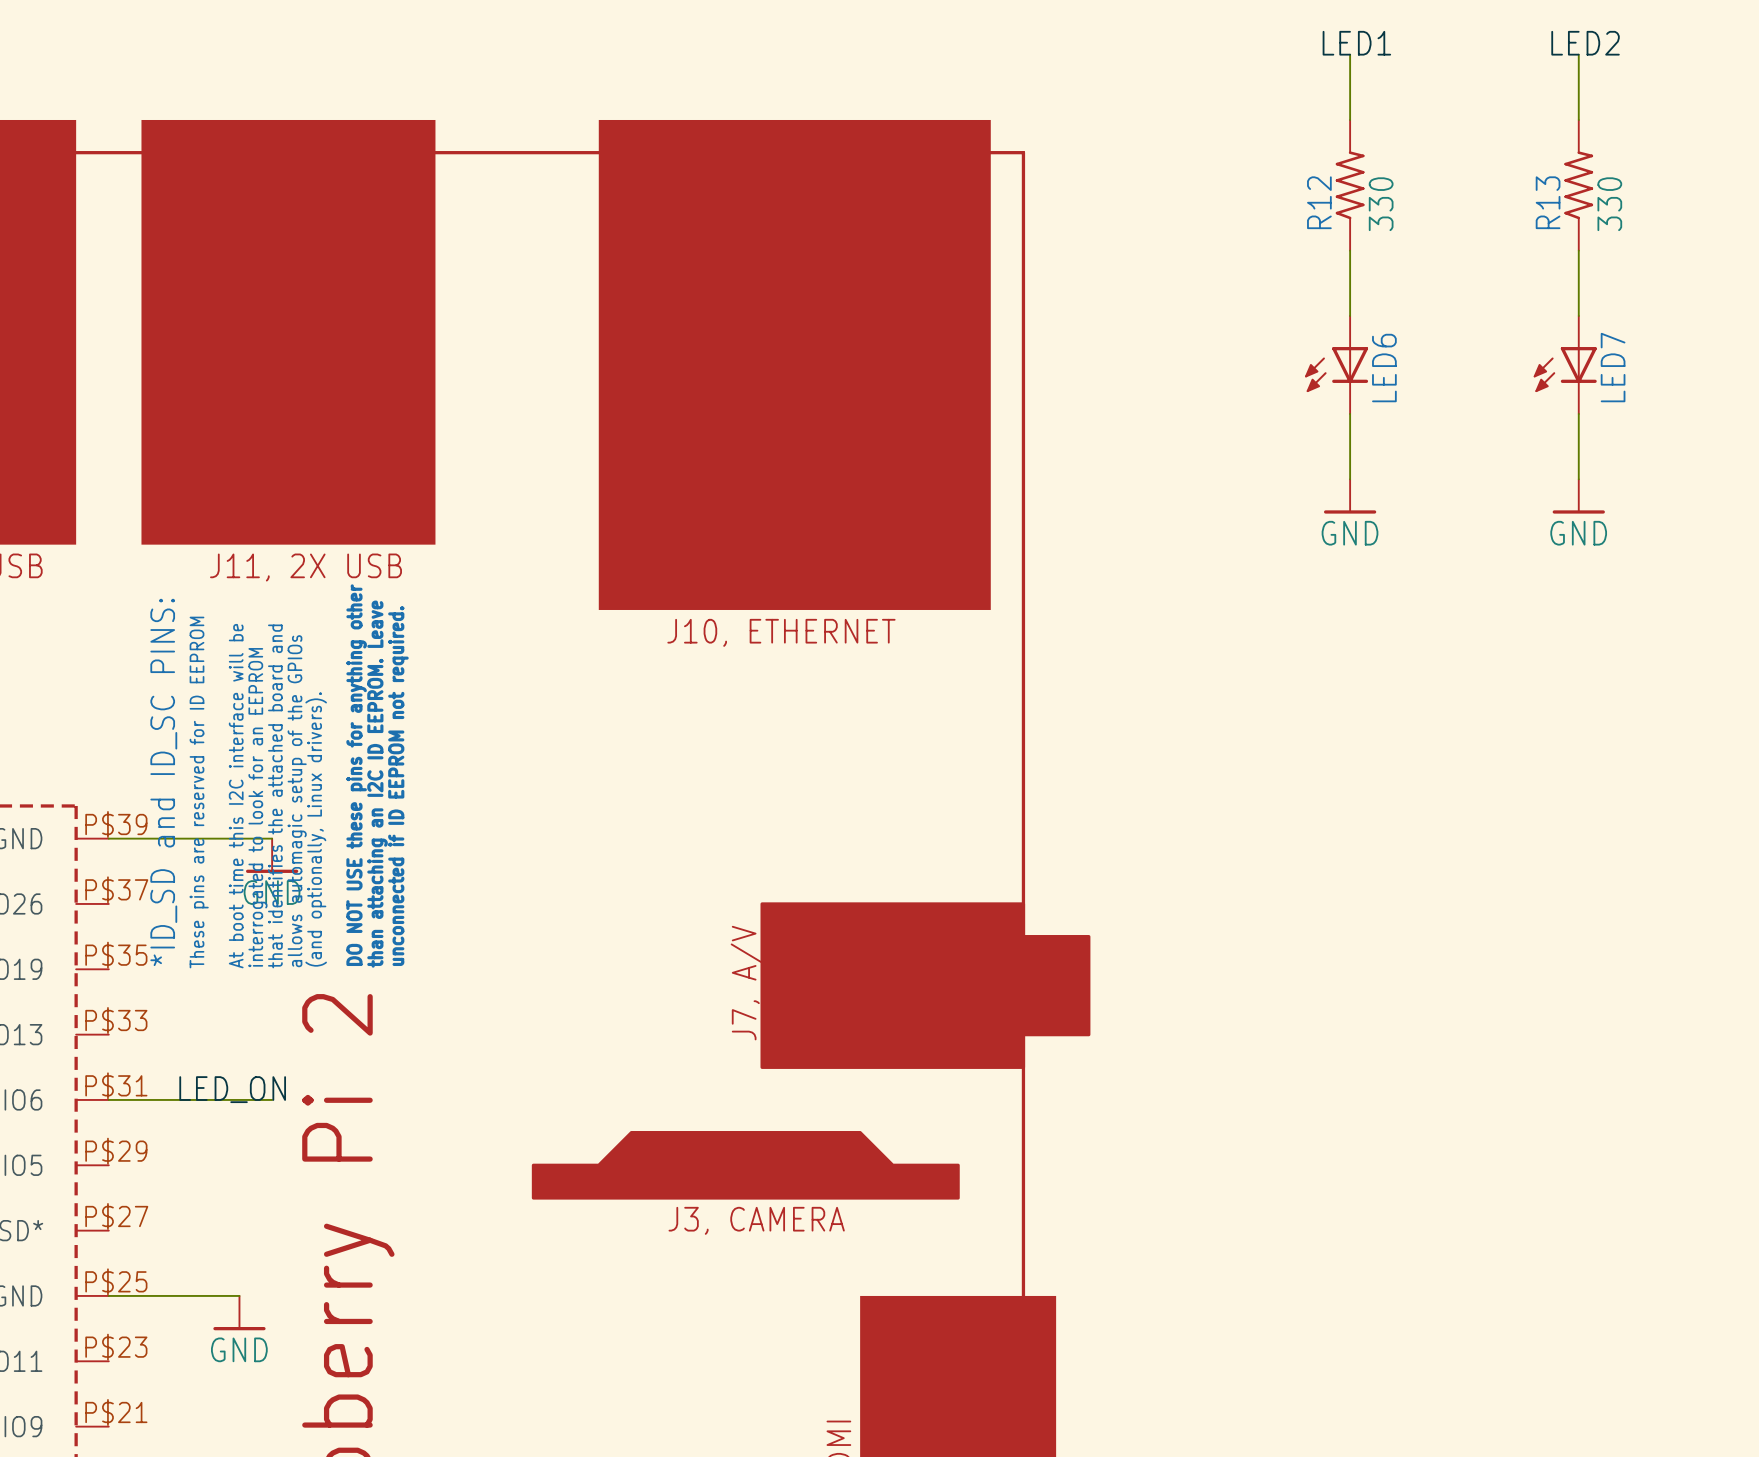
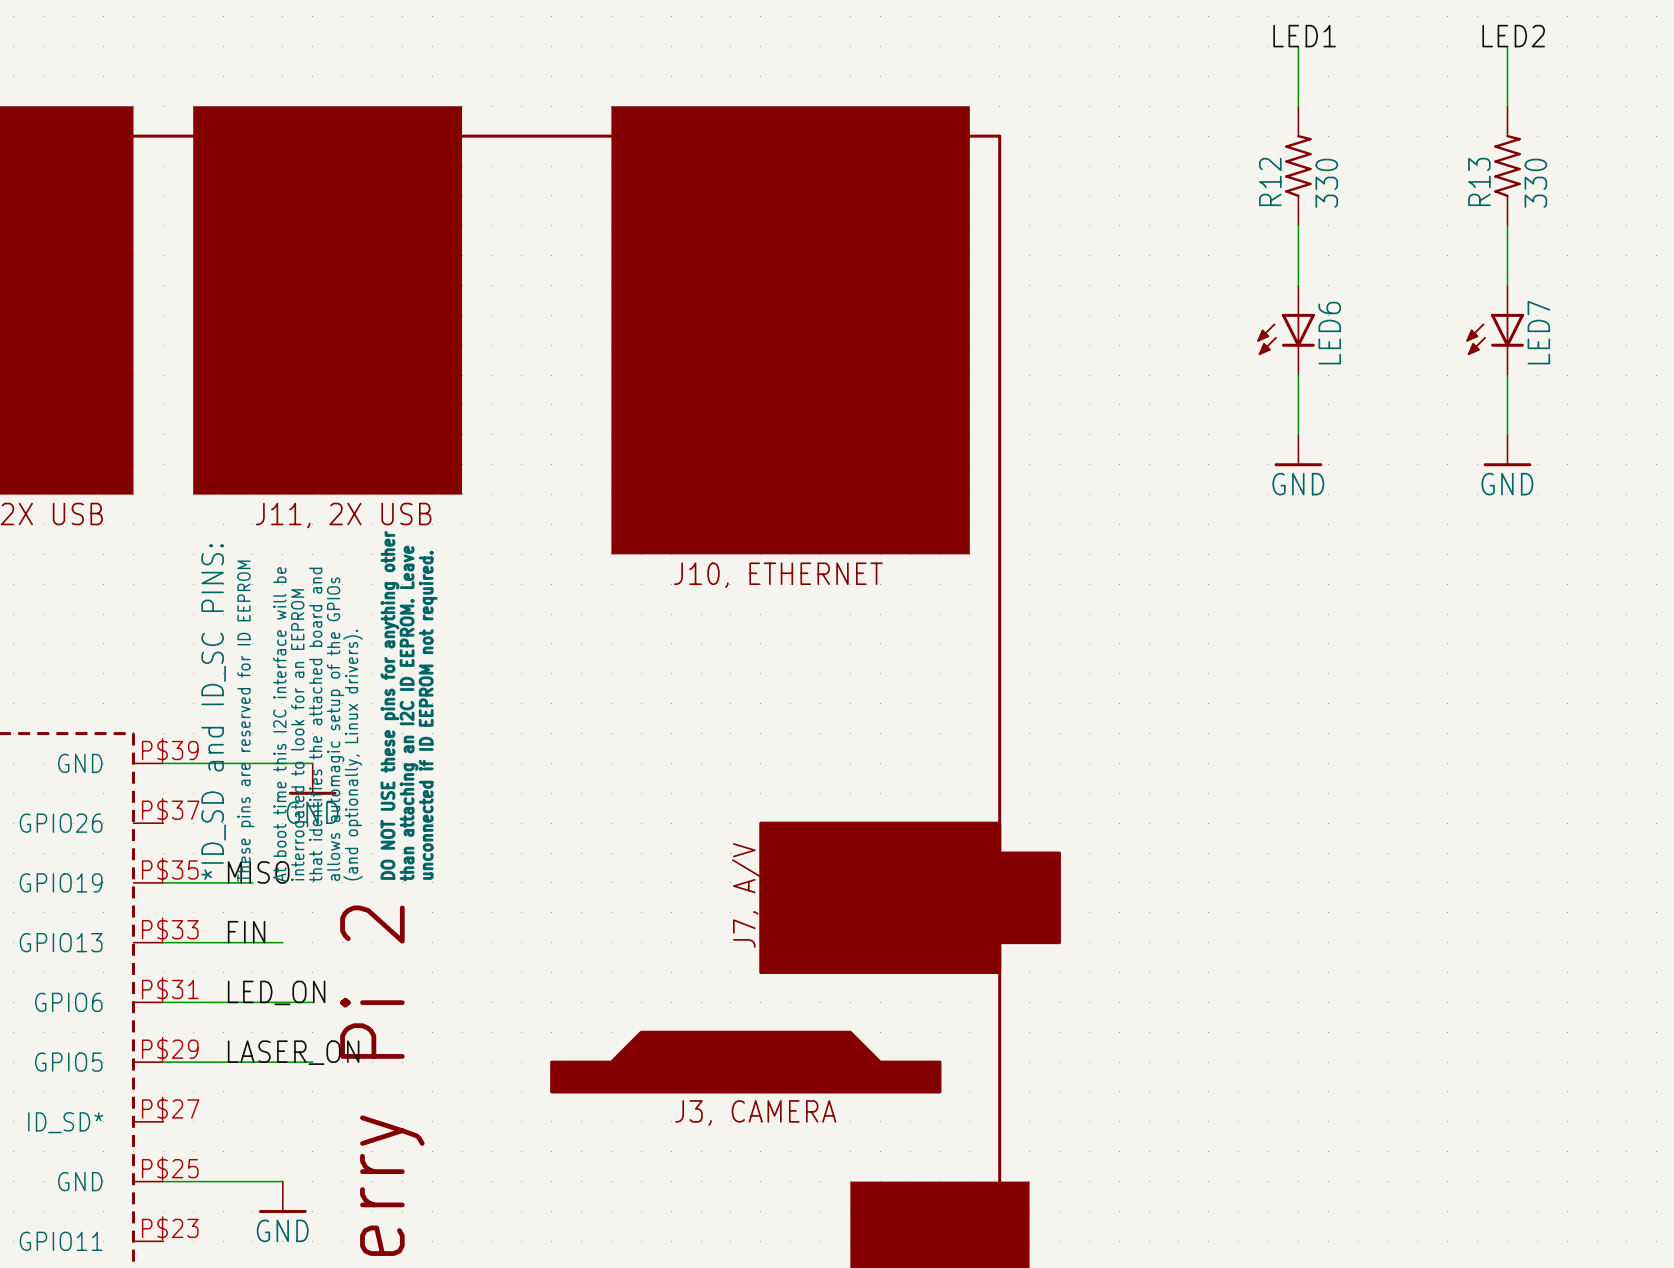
label: none -> MISO (258, 872)
wire: none -> (163, 882) (252, 882)
label: none -> FIN (246, 932)
wire: none -> (163, 942) (282, 942)
label: none -> LASER_ON (293, 1052)
wire: none -> (163, 1062) (312, 1062)

